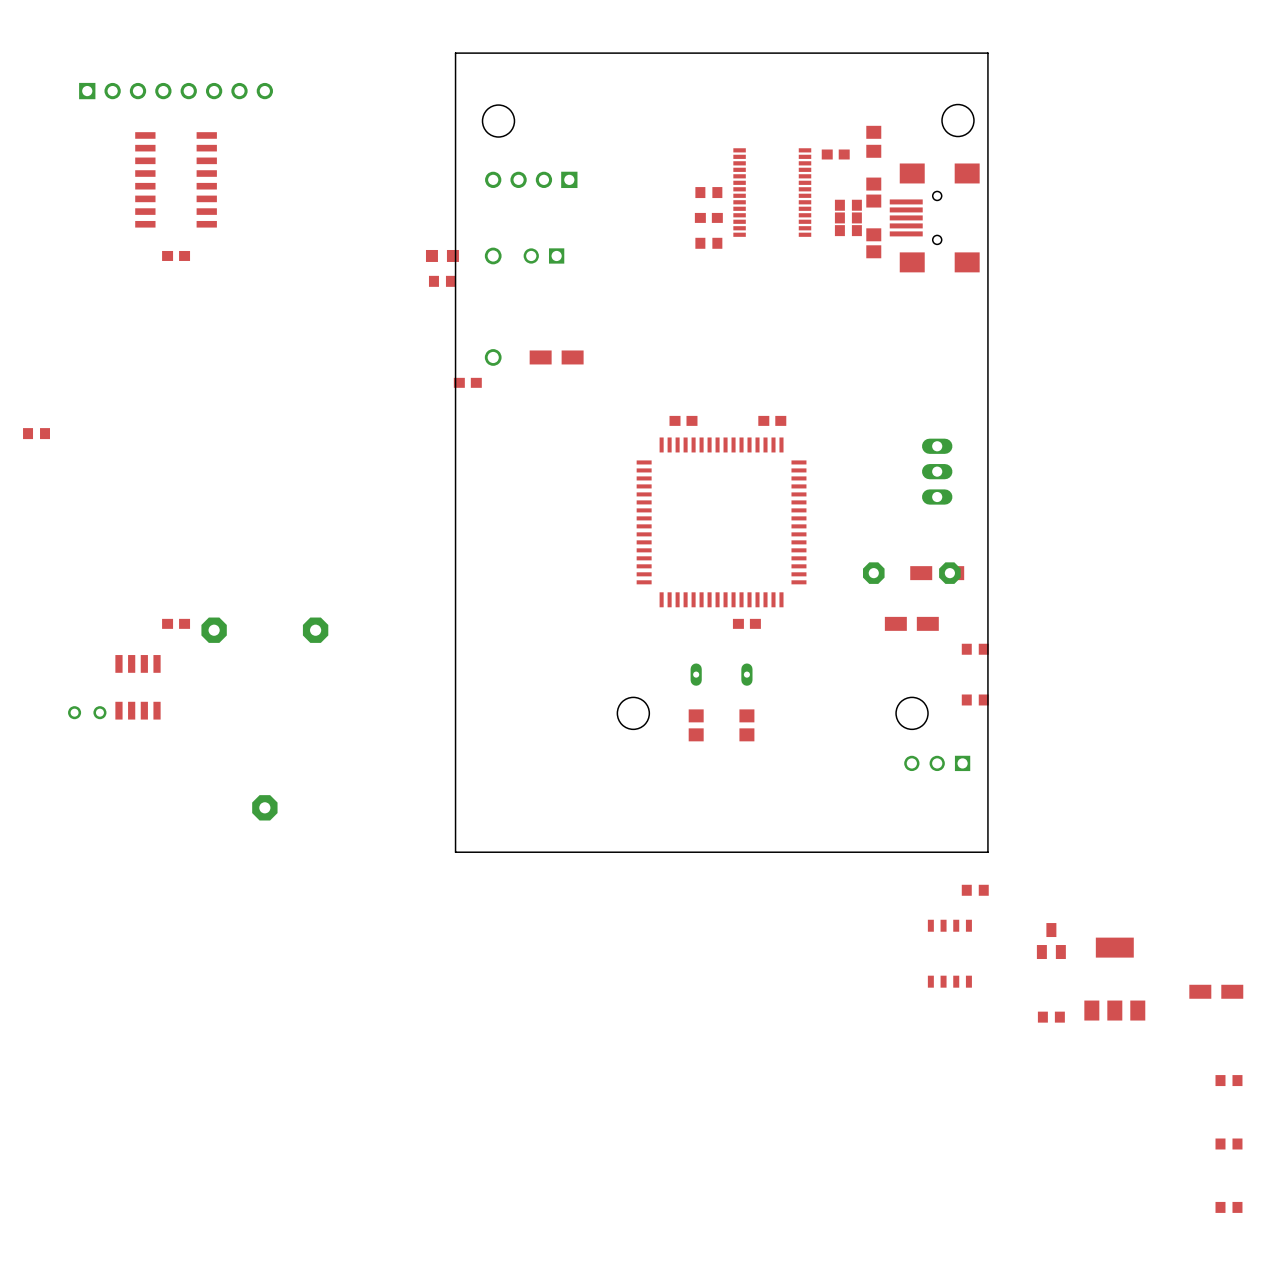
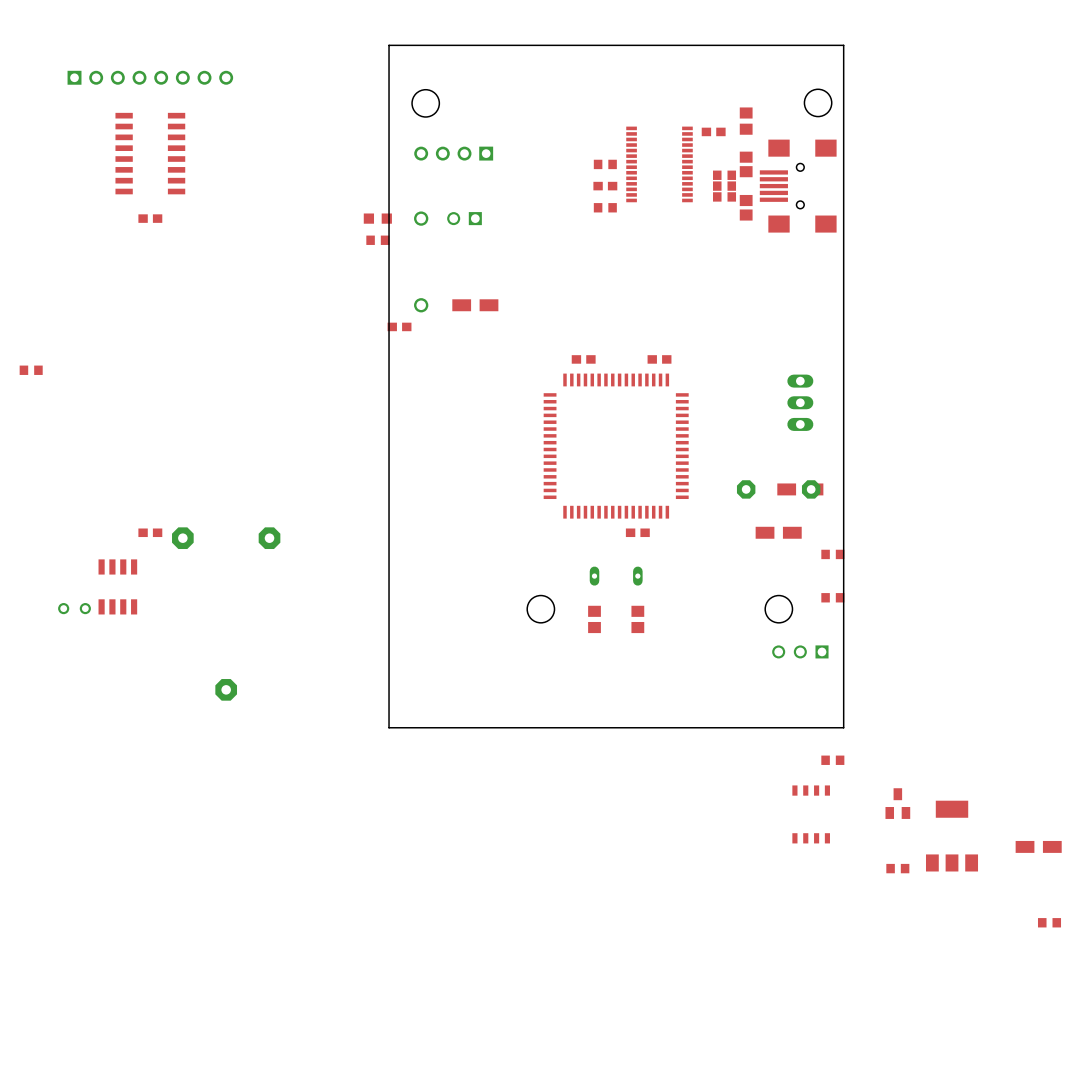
part: (1228, 1143) -> none
part: (1228, 1207) -> none

